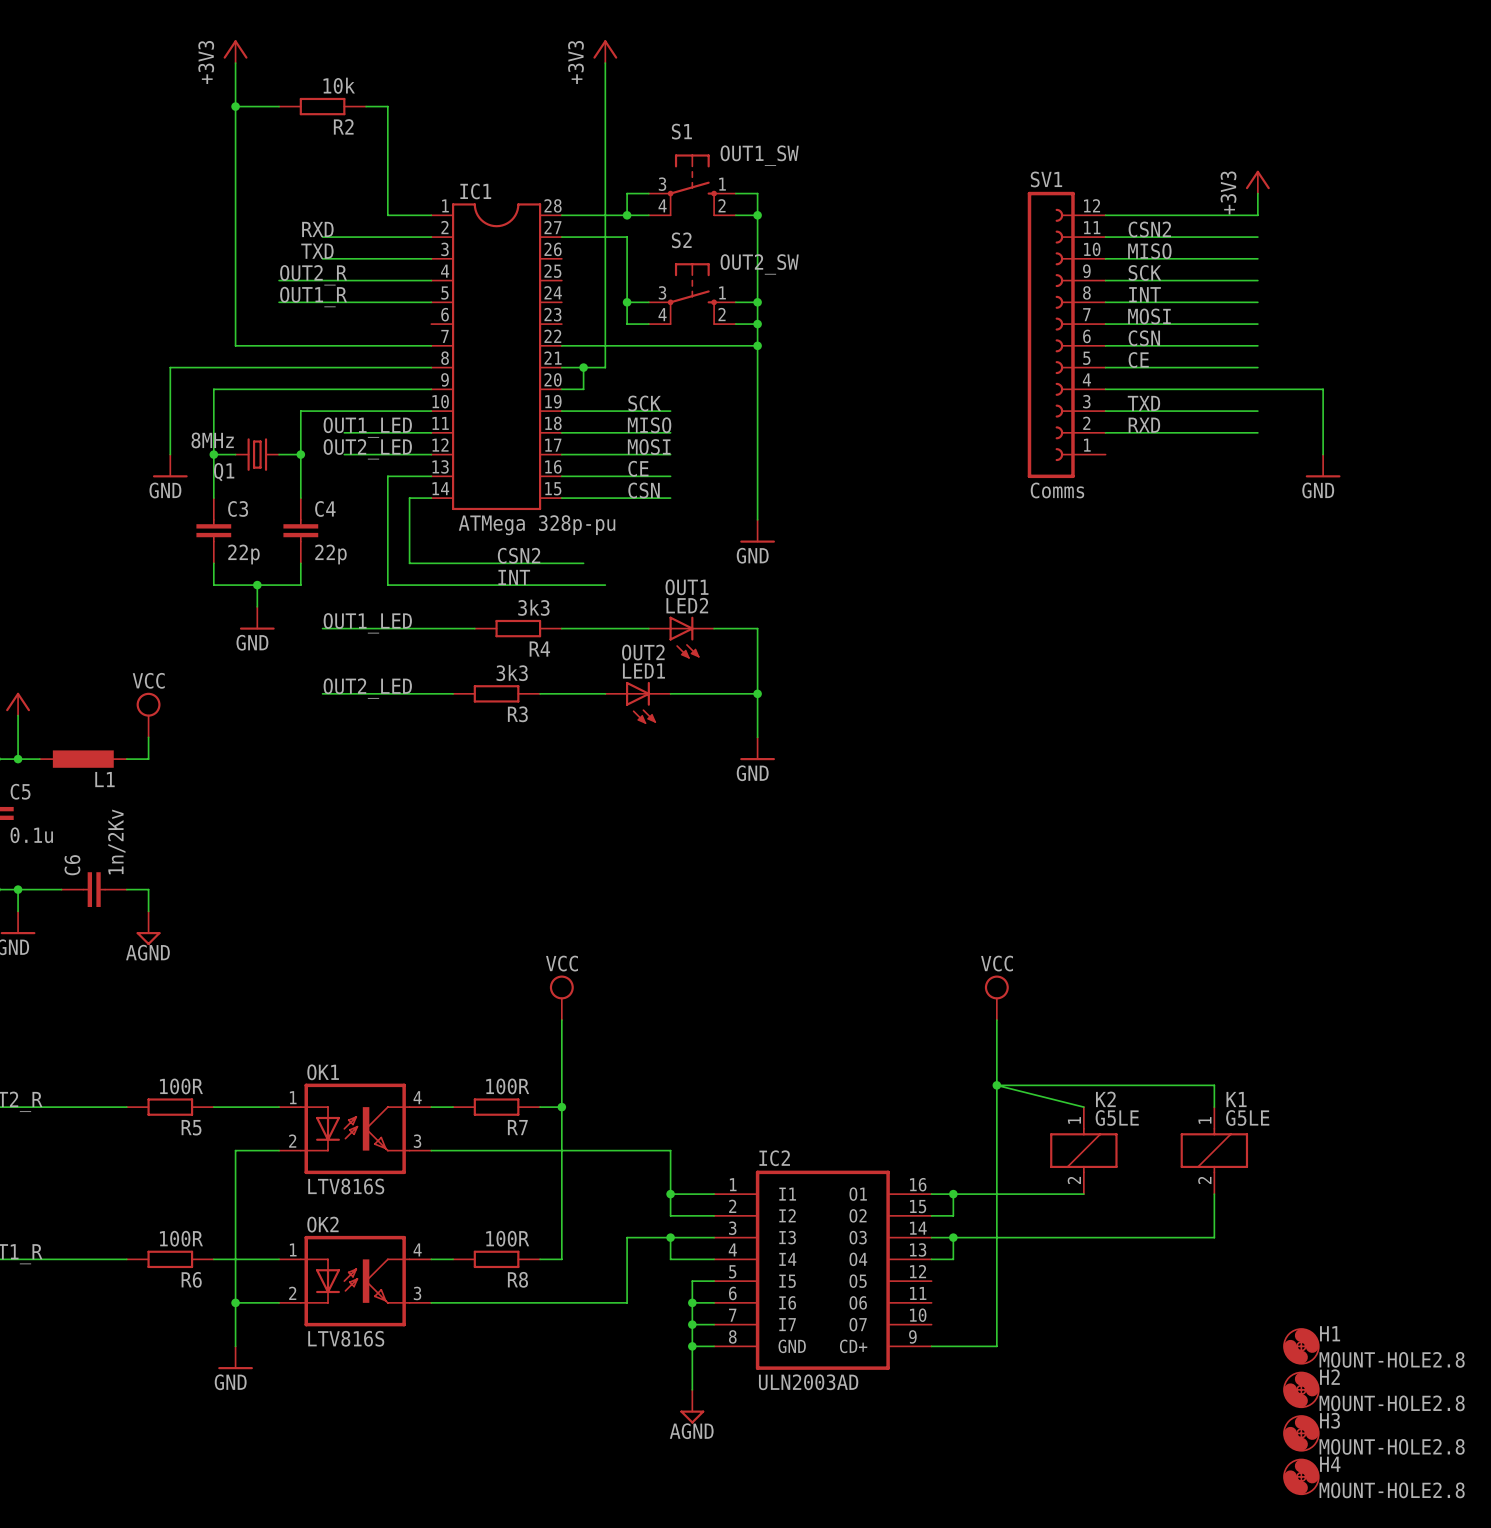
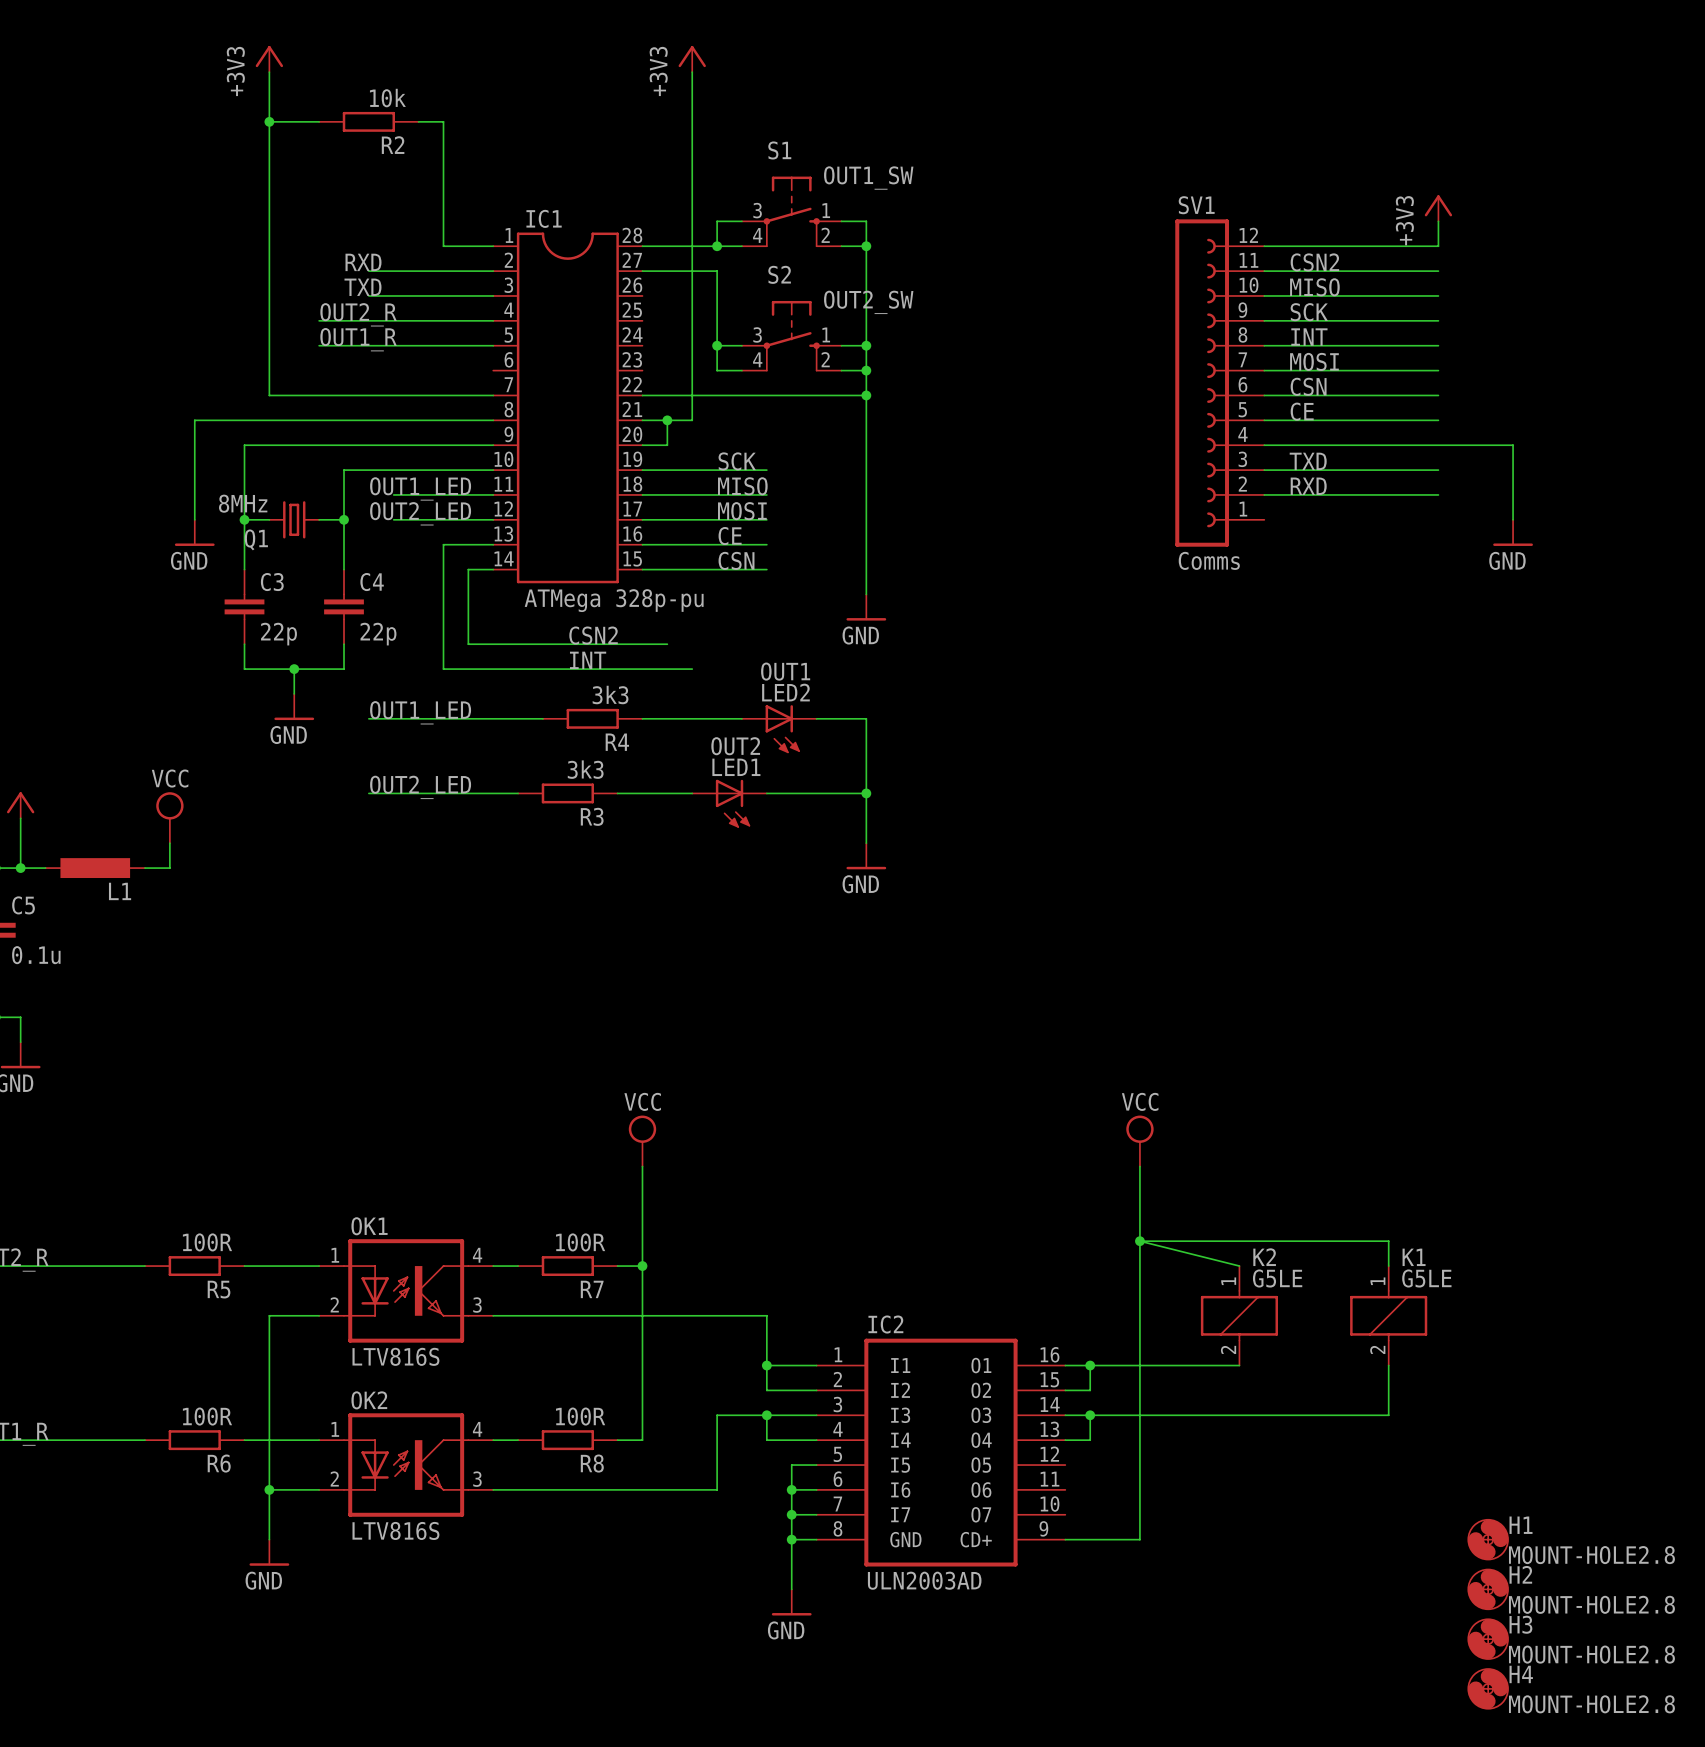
wire: (18, 889) (61, 889) -> none
junction: (18, 889) -> none
C6: 1n/2Kv (94, 889) -> none
wire: (126, 889) (148, 889) (148, 911) -> none
power symbol: AGND (148, 928) -> none
power symbol: AGND (692, 1406) -> GND (791, 1602)

